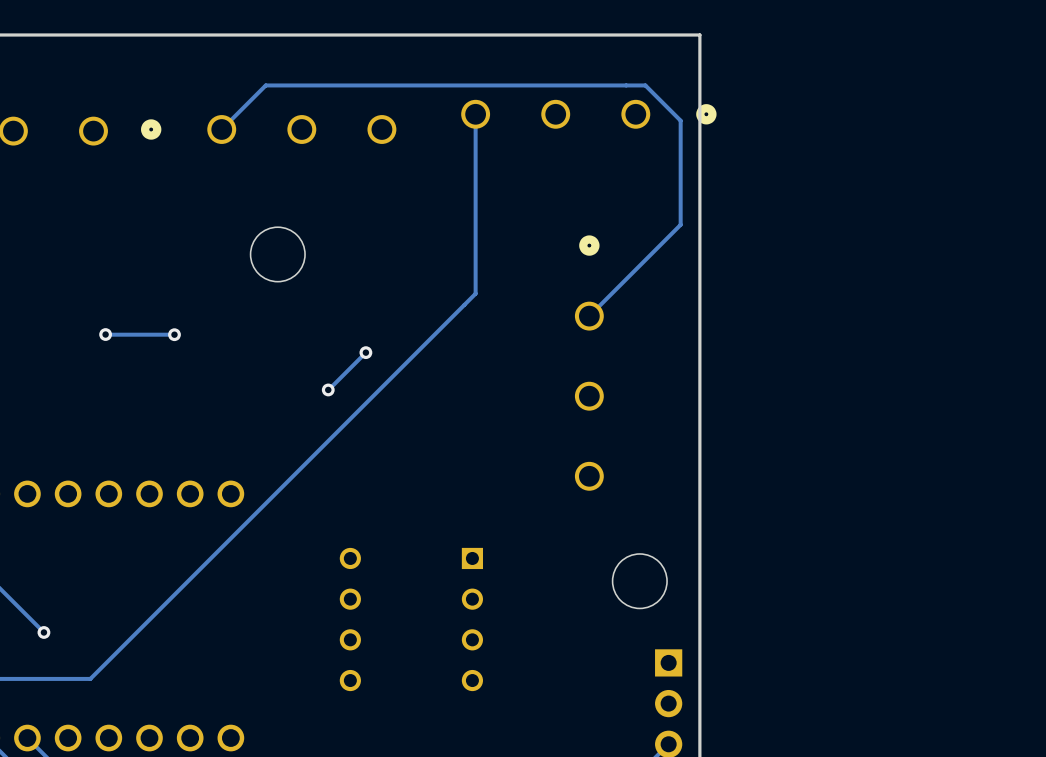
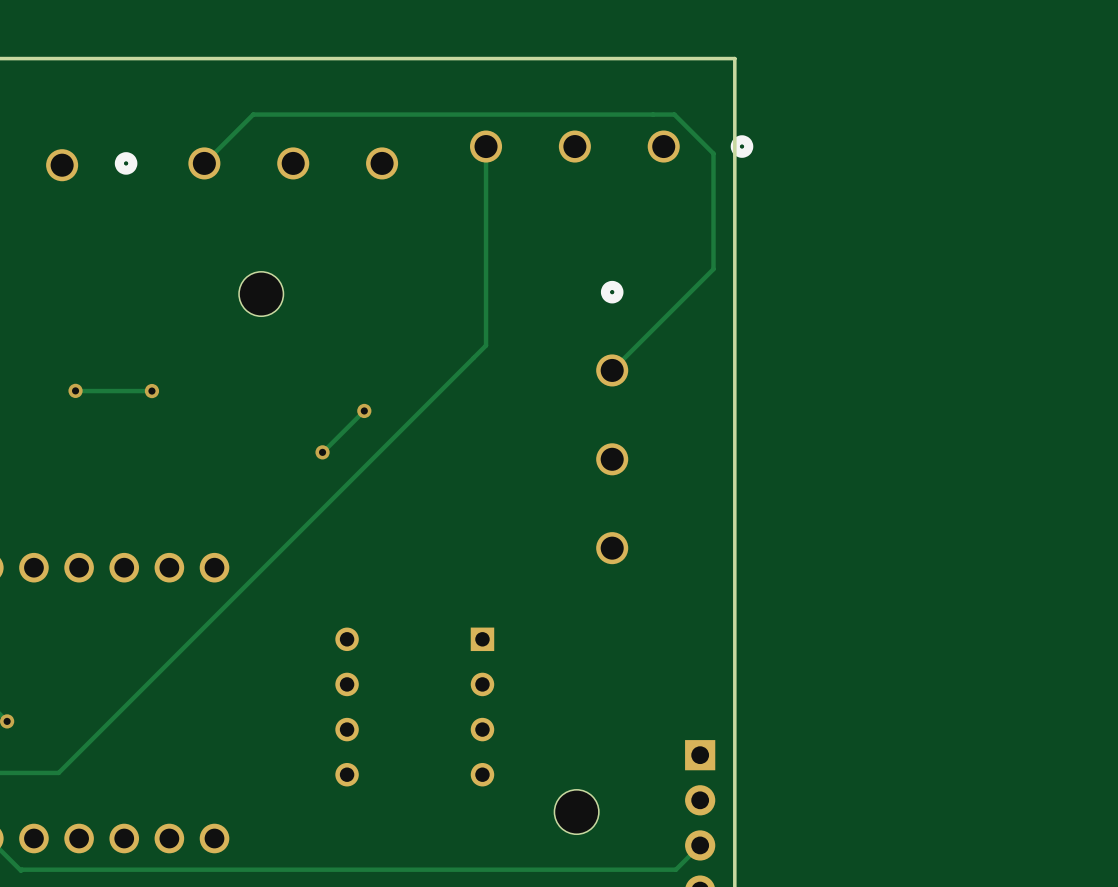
round board edge: [249, 226, 306, 283] -> none
part: none -> (261, 294)
round board edge: [611, 553, 668, 610] -> none
part: none -> (576, 812)

